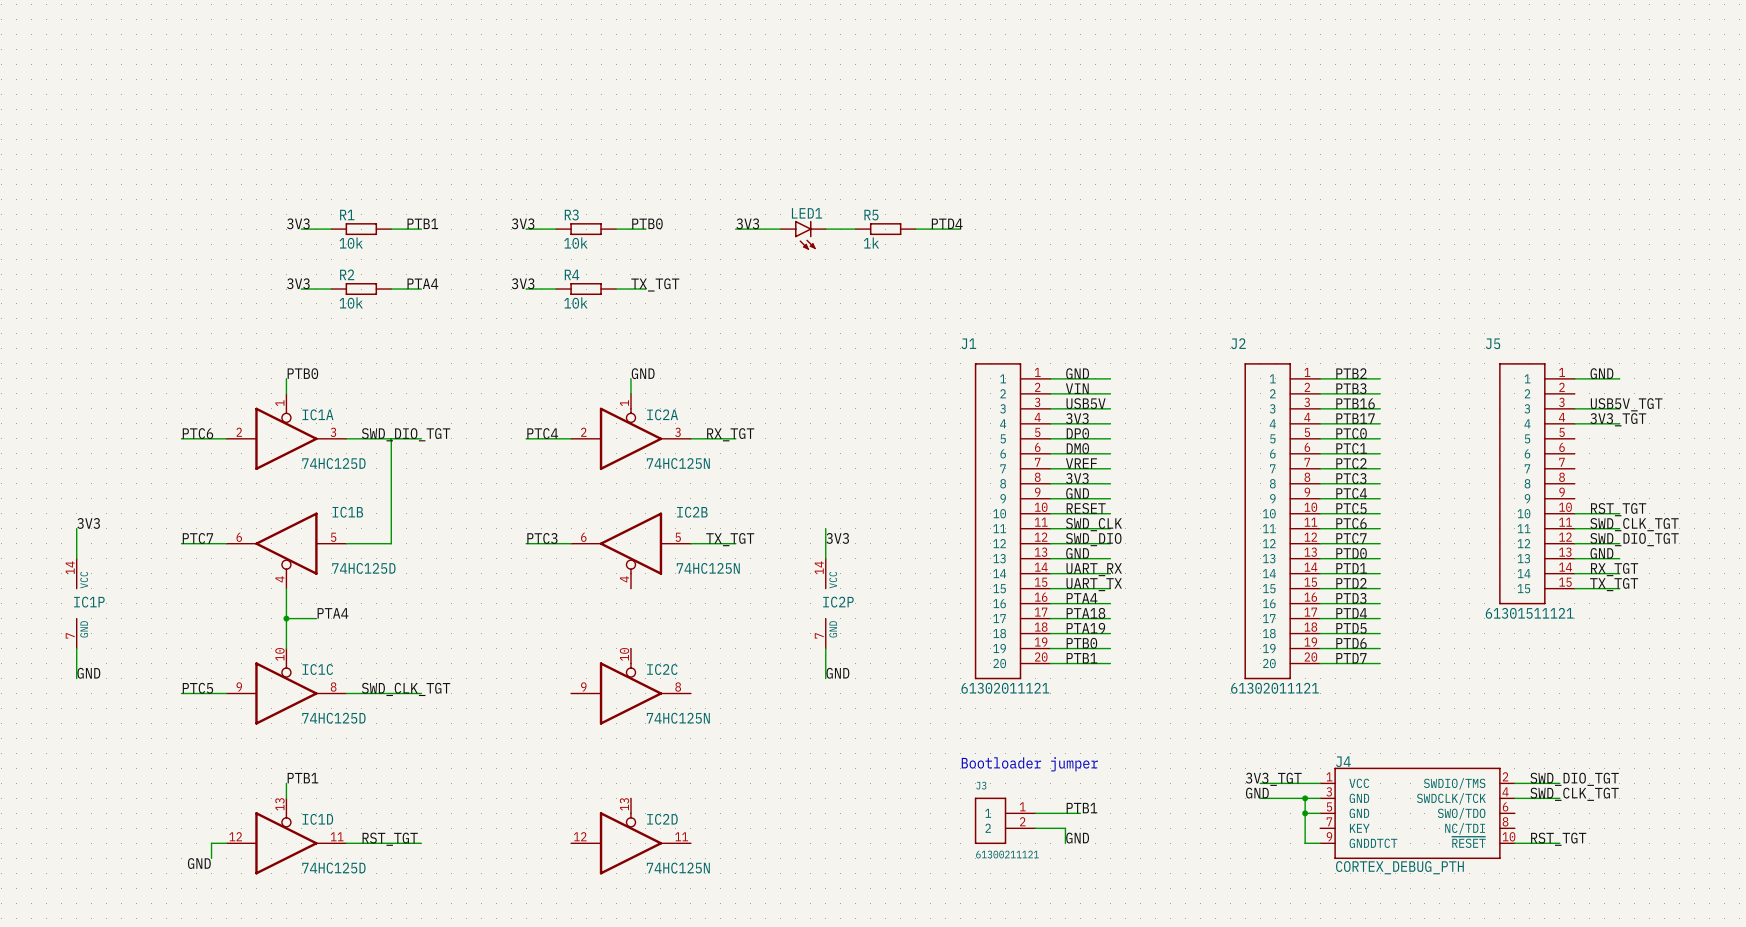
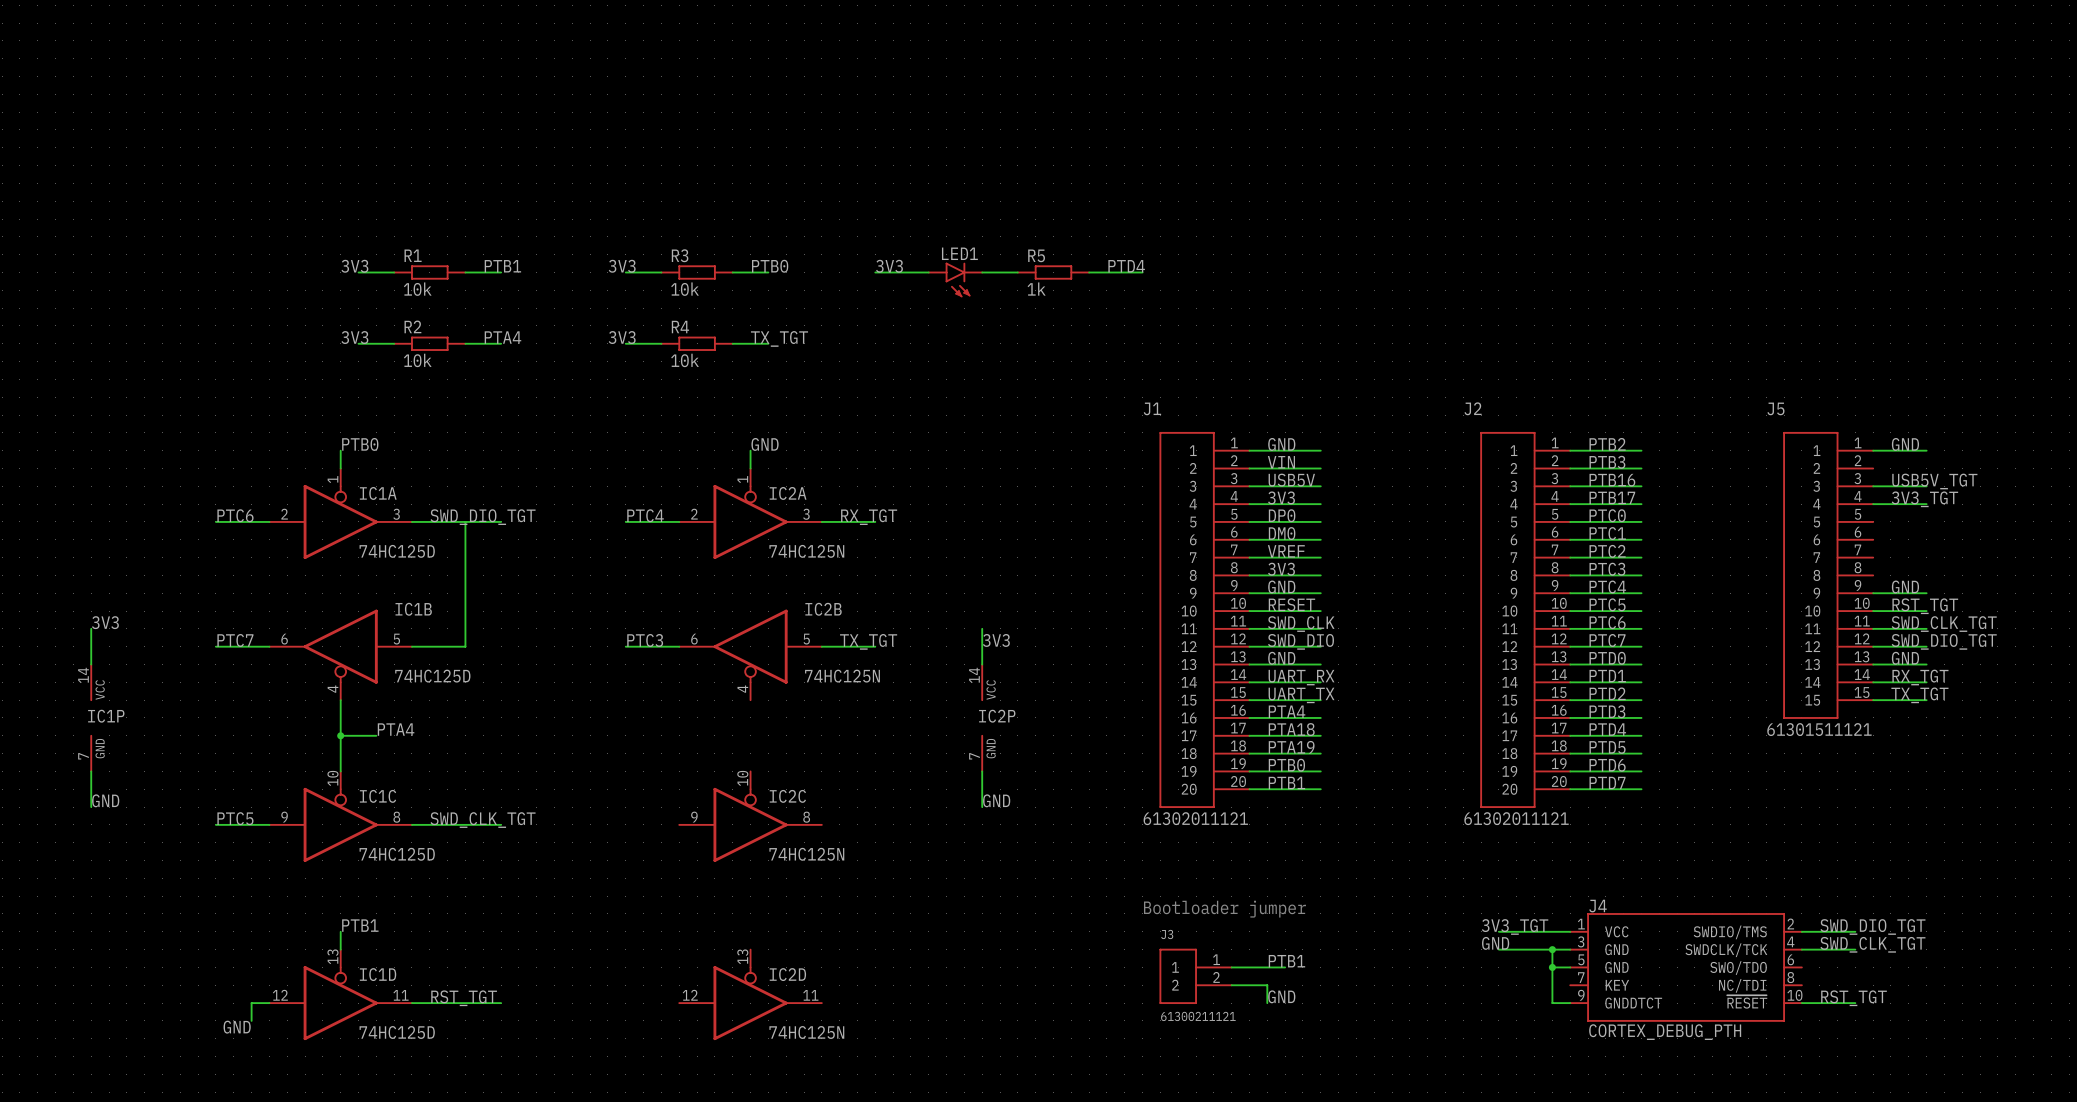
label: none -> GND (1905, 587)
wire: none -> (1873, 593) (1926, 593)

